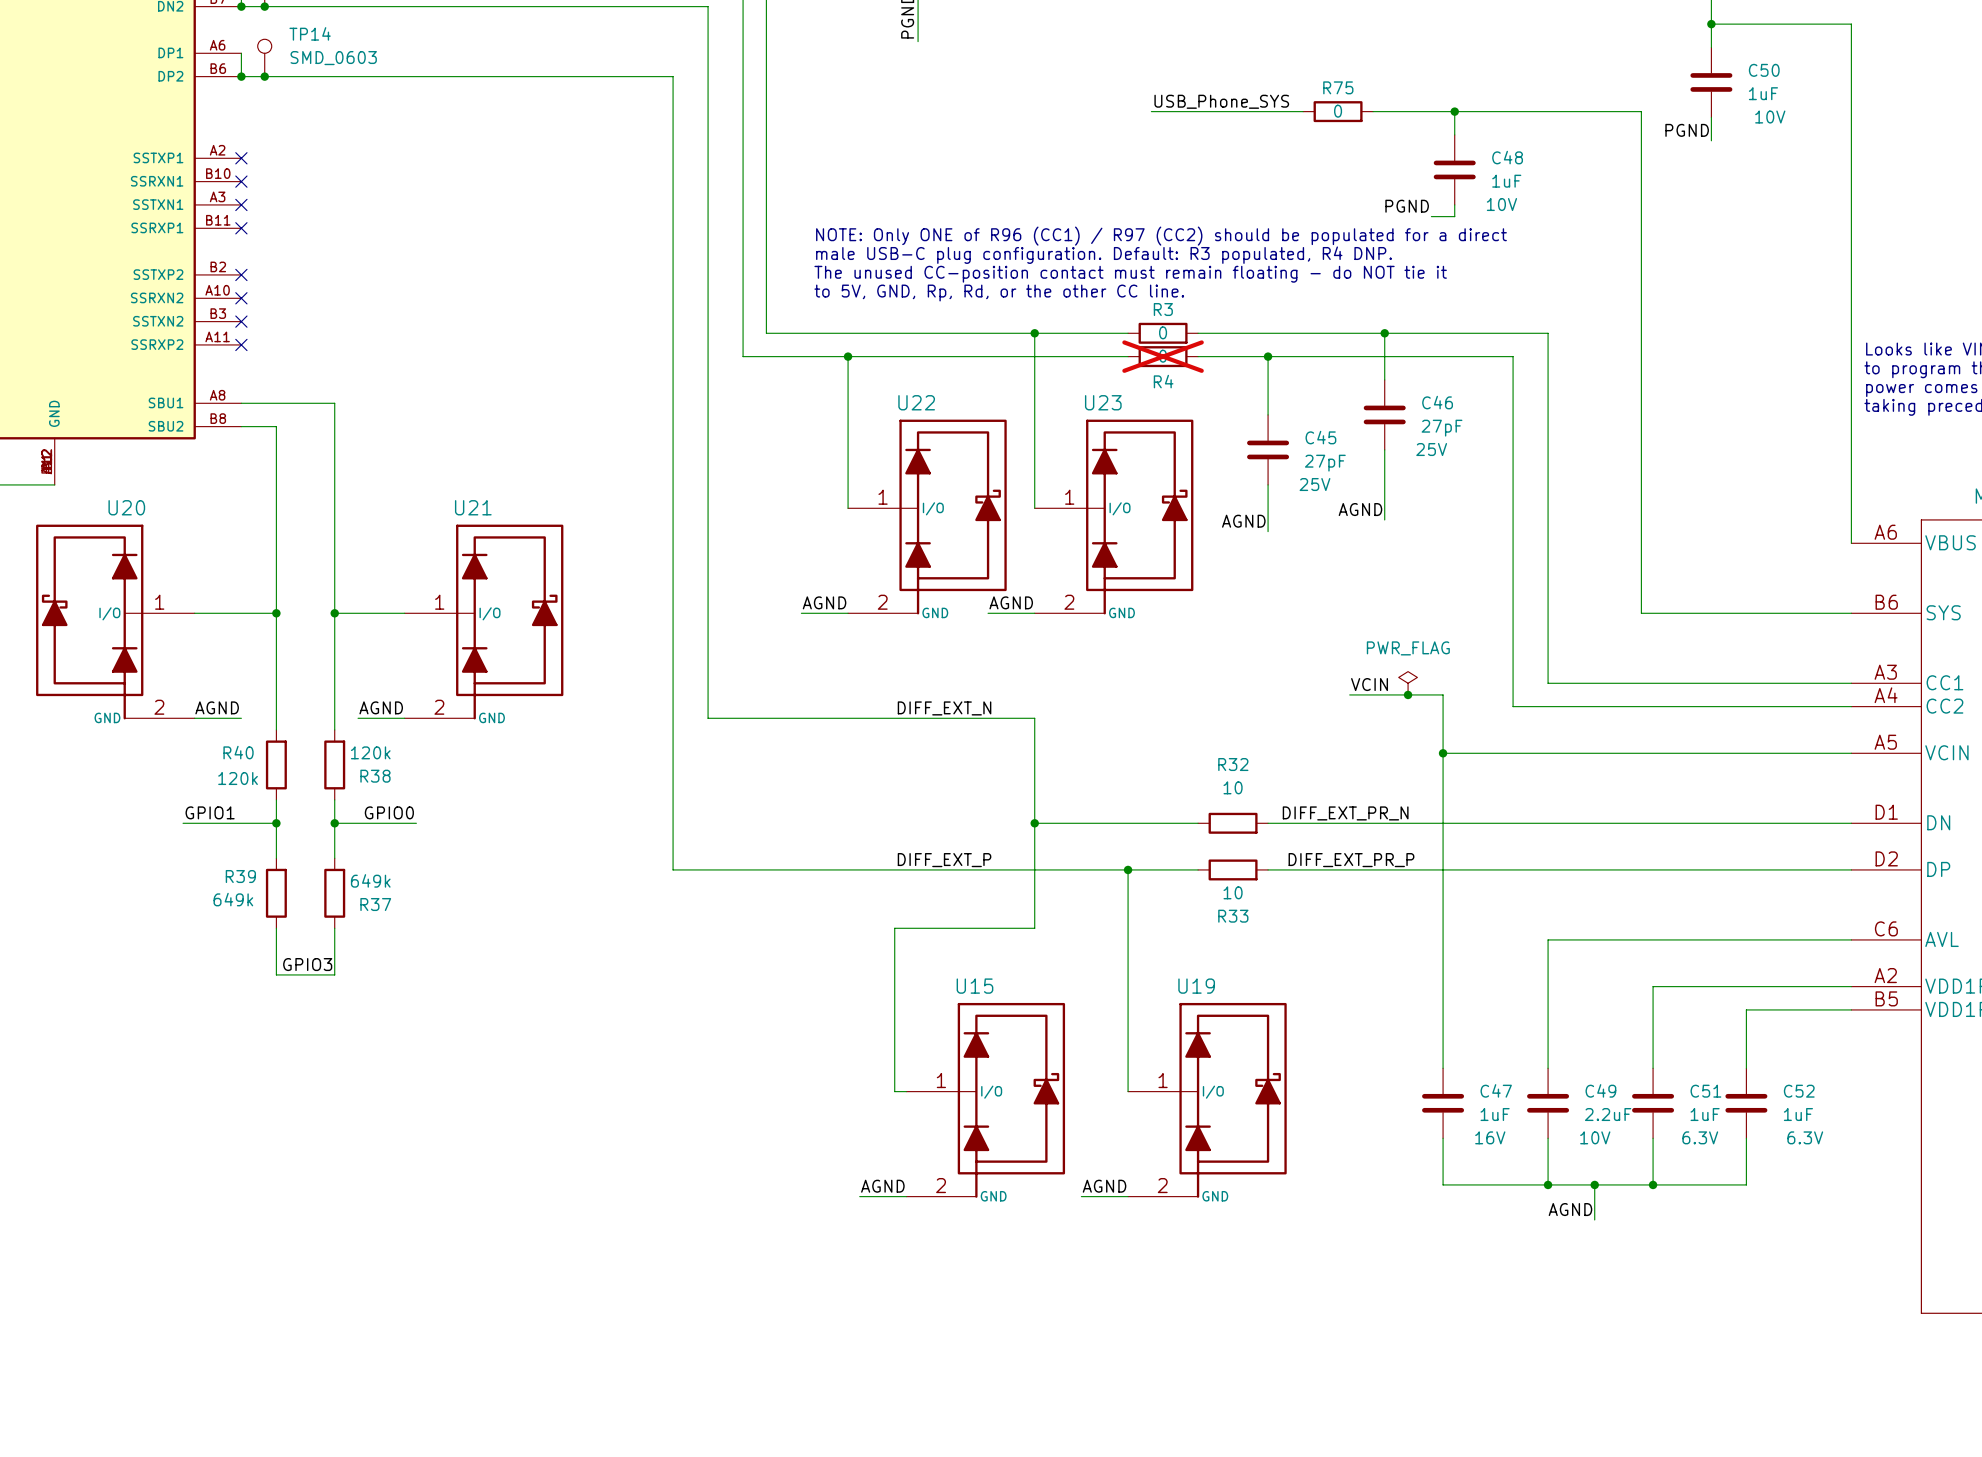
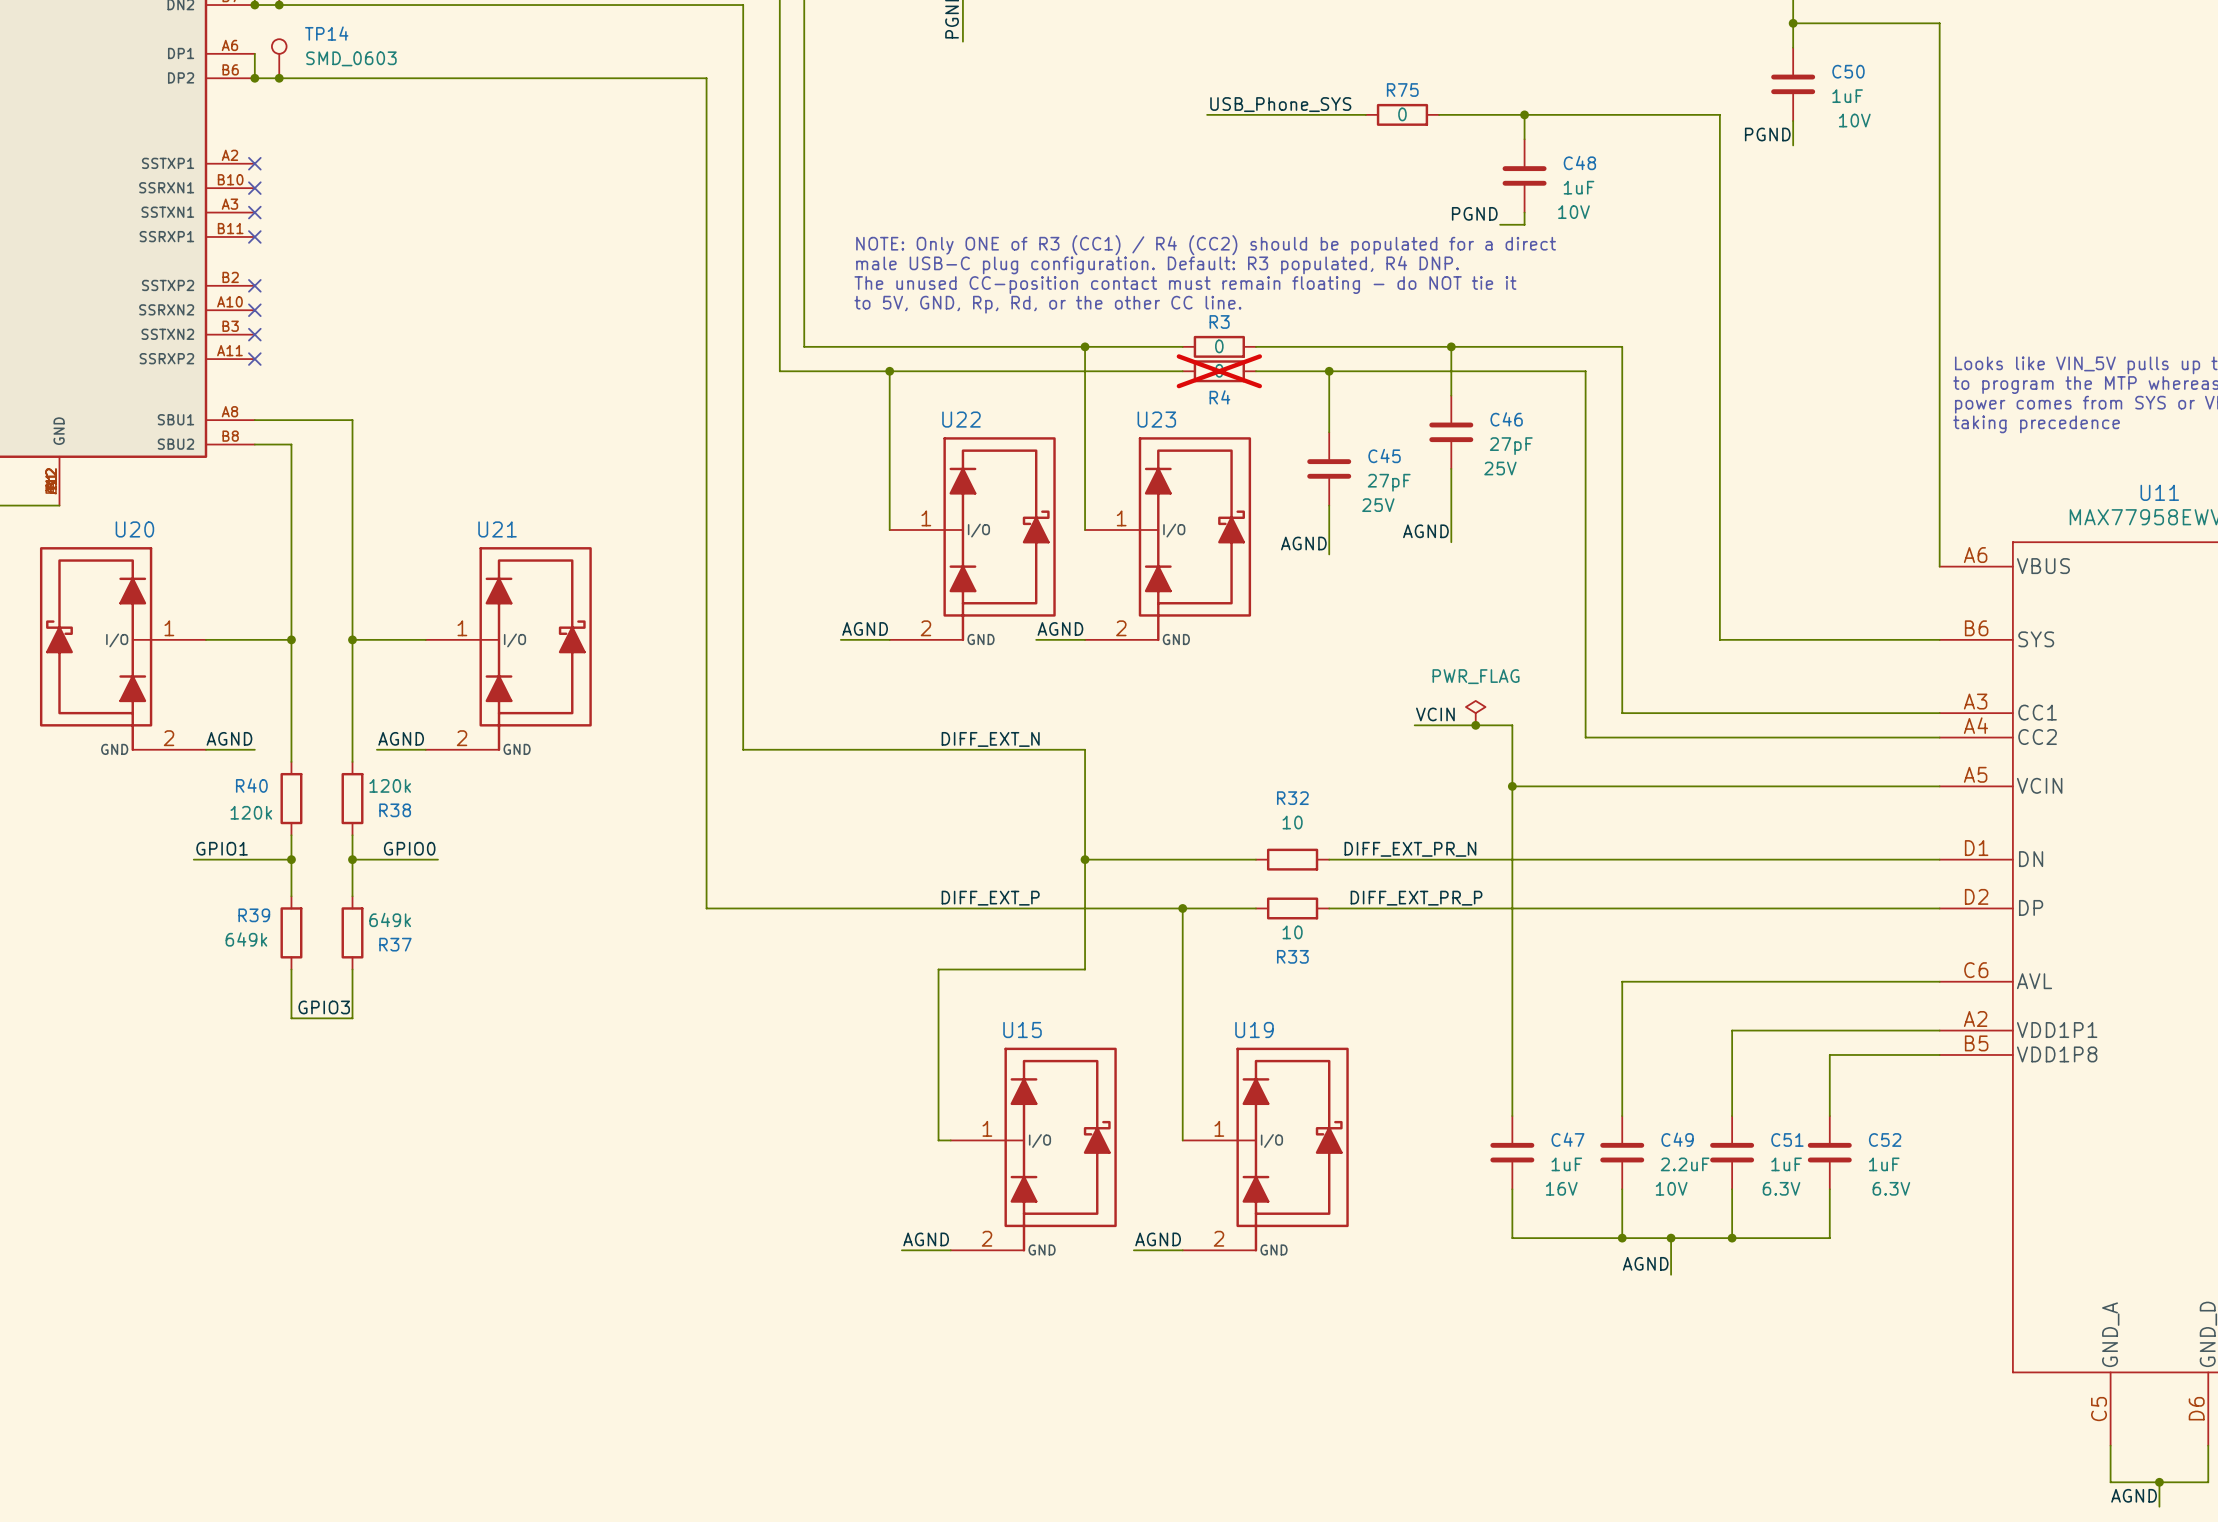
text: NOTE: Only ONE of R96 (CC1) / R97 (CC2) should be populated for a direct (1161, 236) -> NOTE: Only ONE of R3 (CC1) / R4 (CC2) should be populated for a direct (1206, 245)

